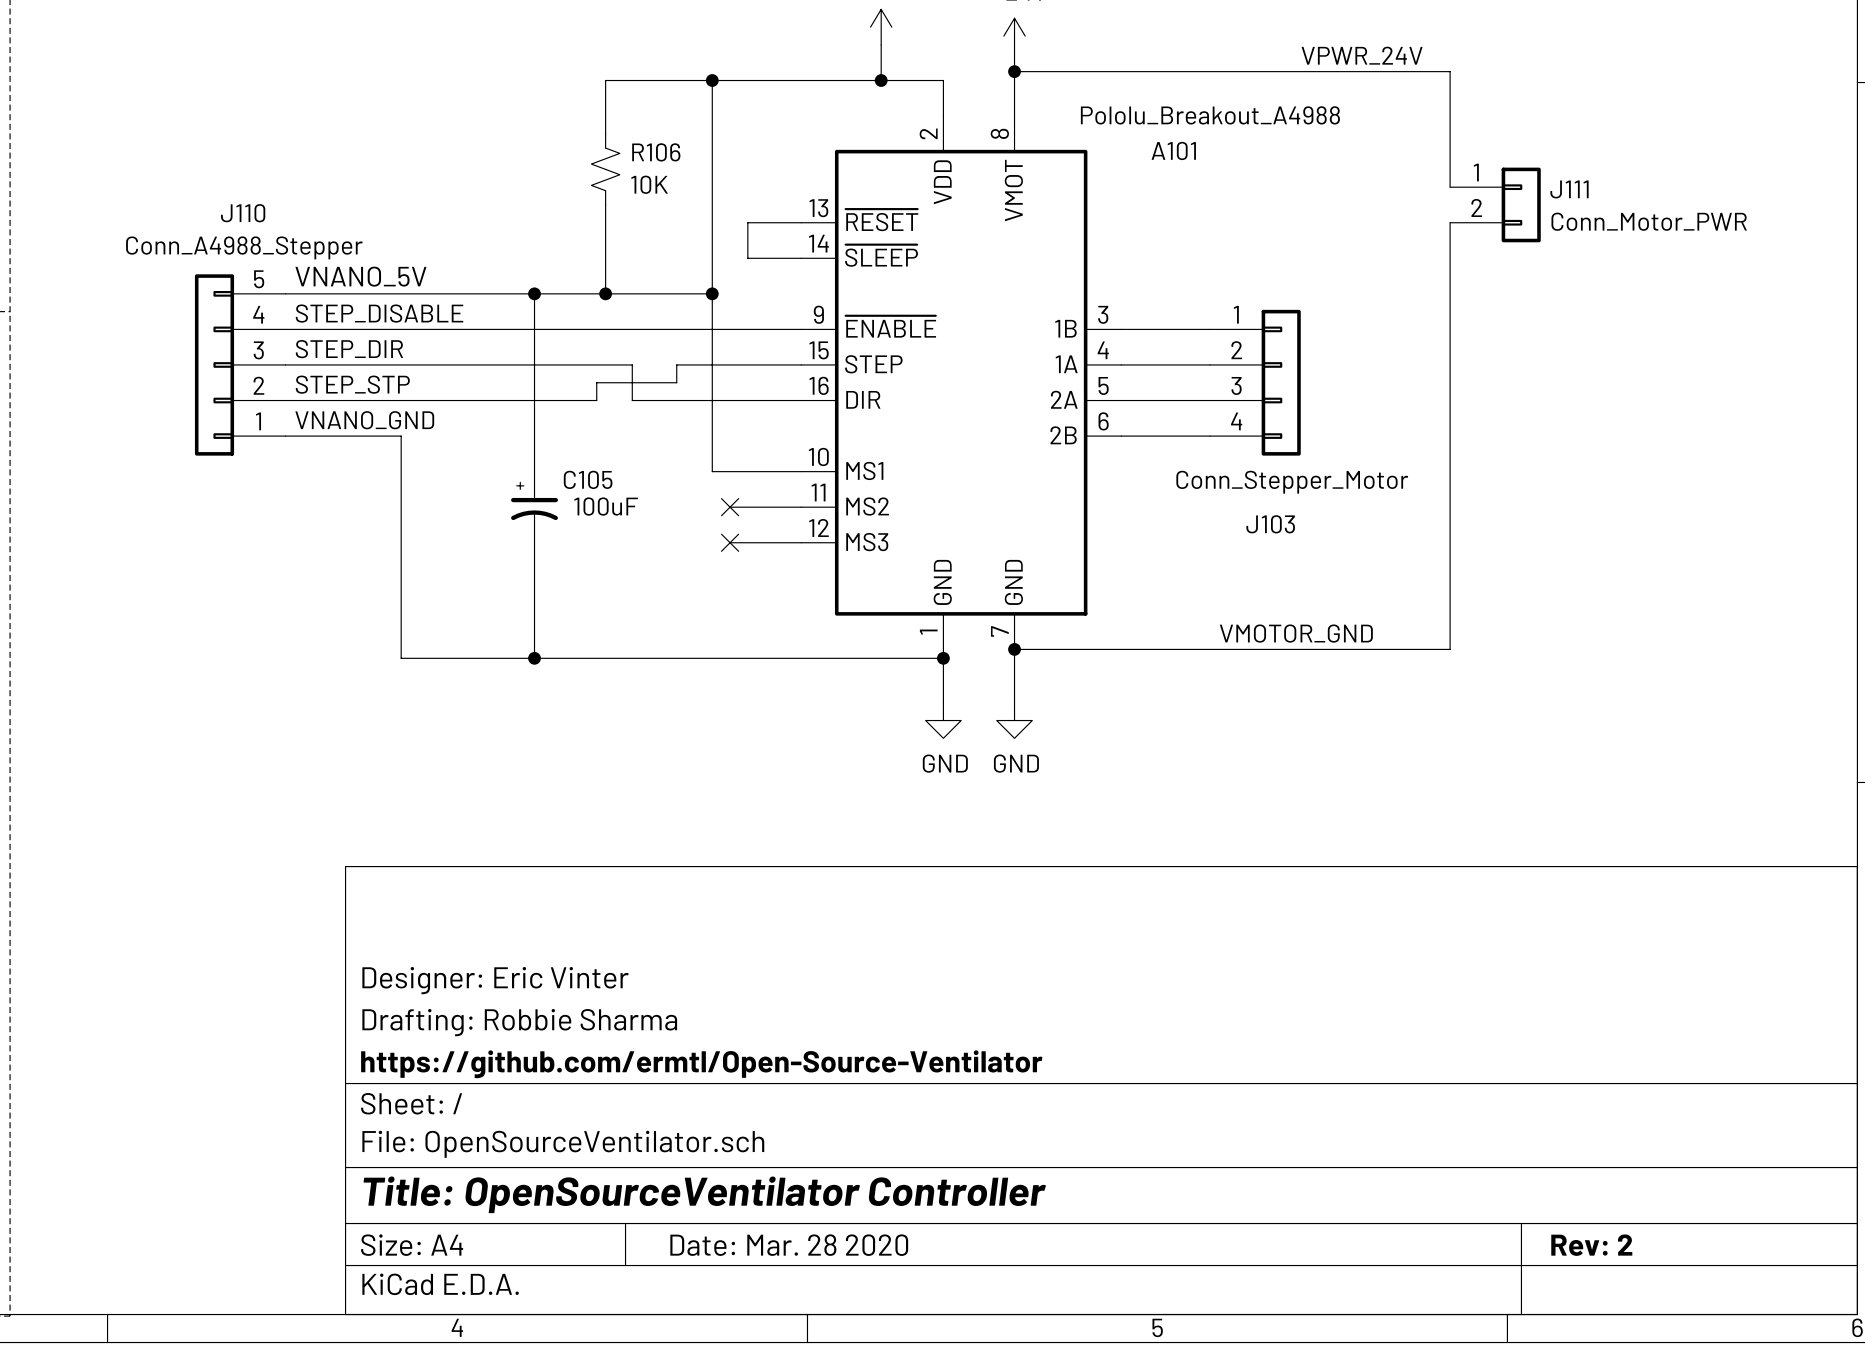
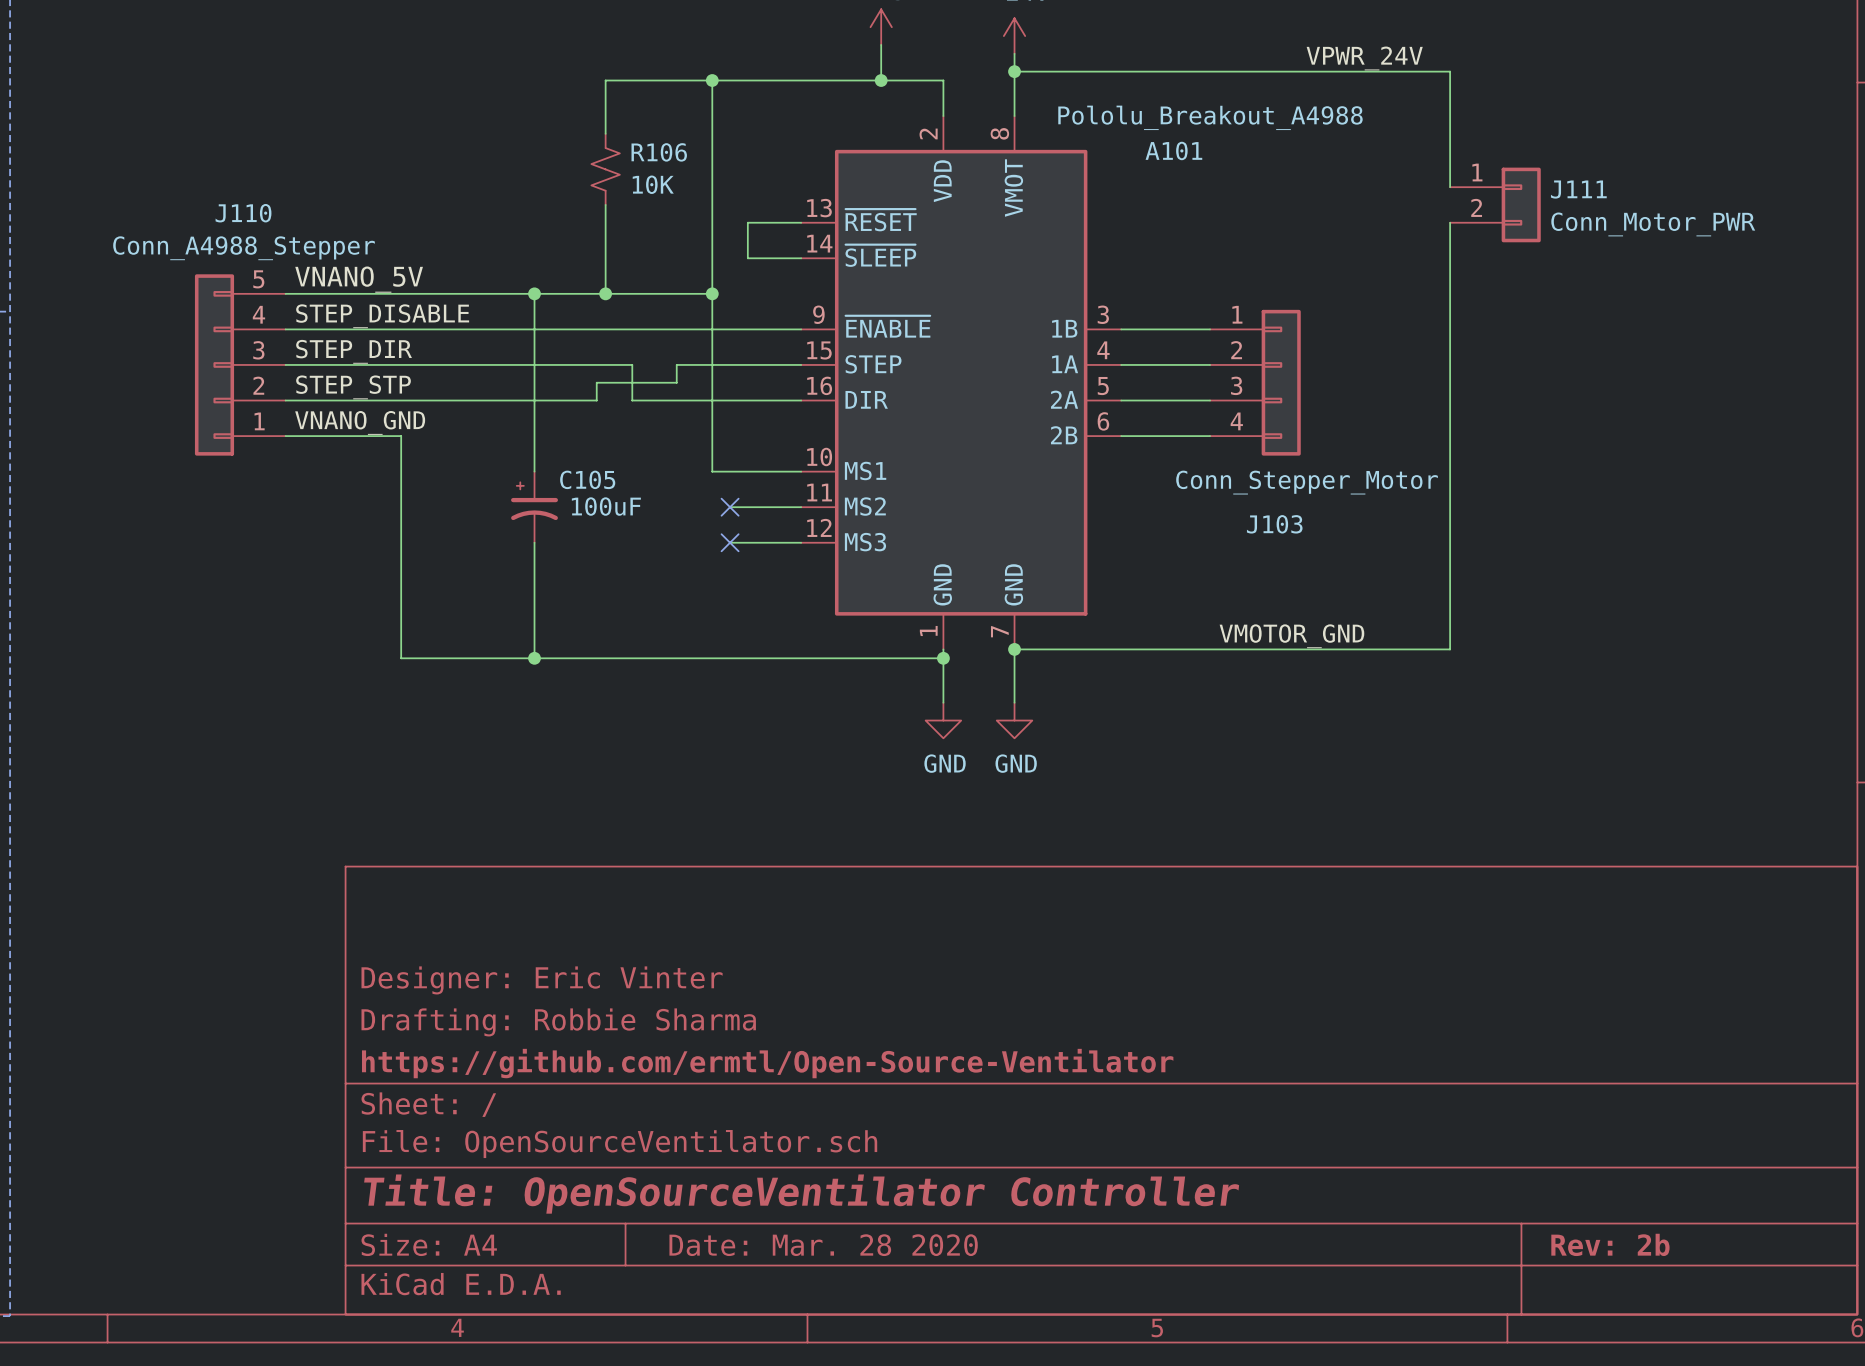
title block: Rev: 2 (1591, 1245) -> Rev: 2b (1610, 1244)

